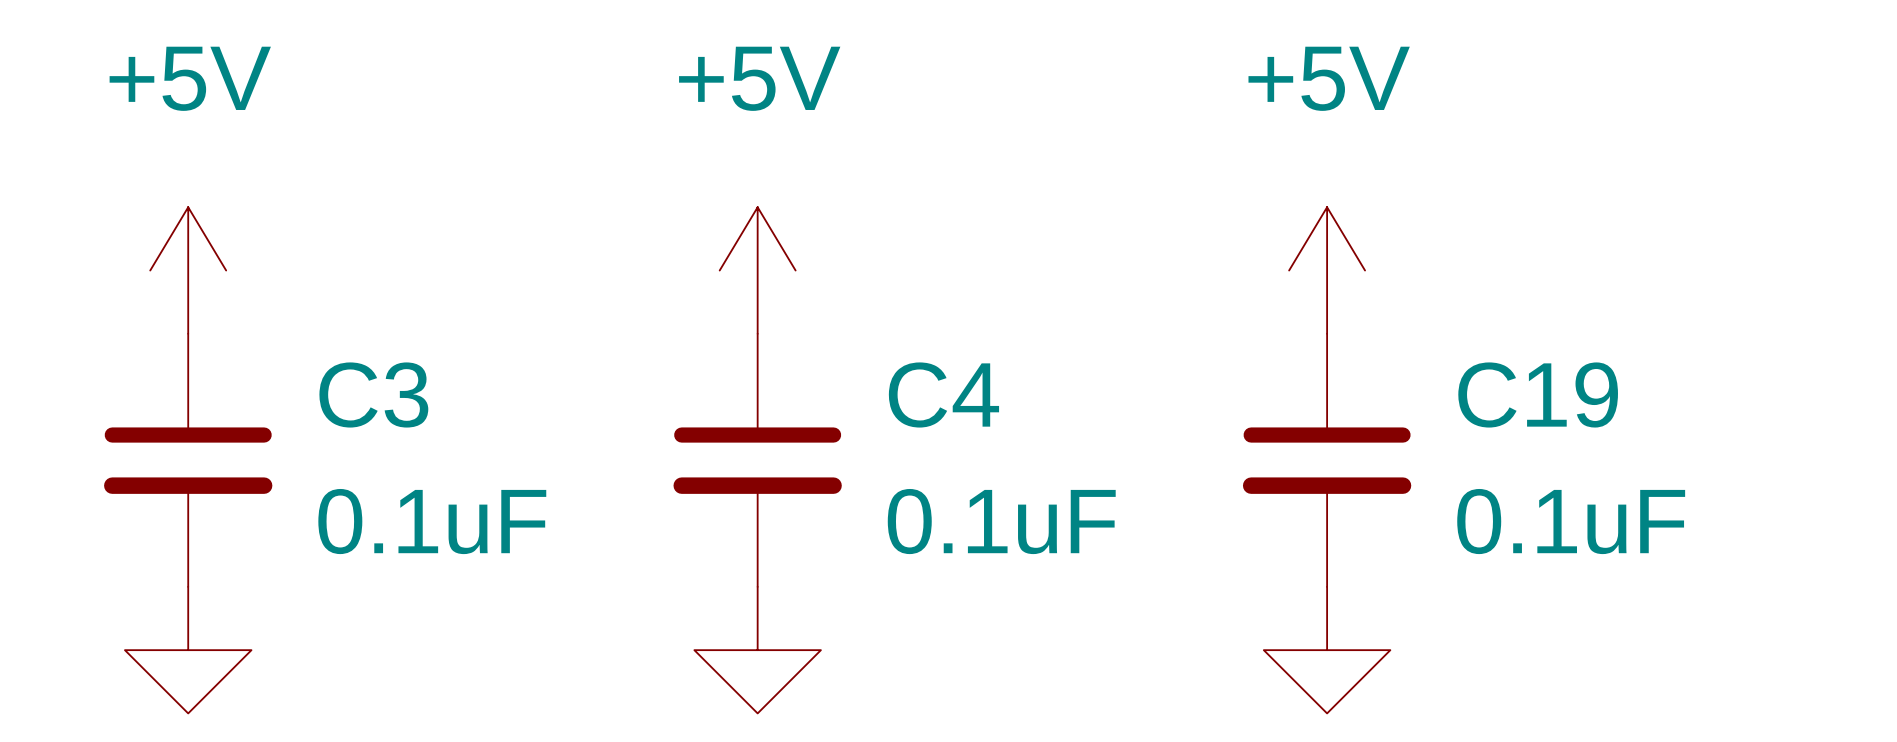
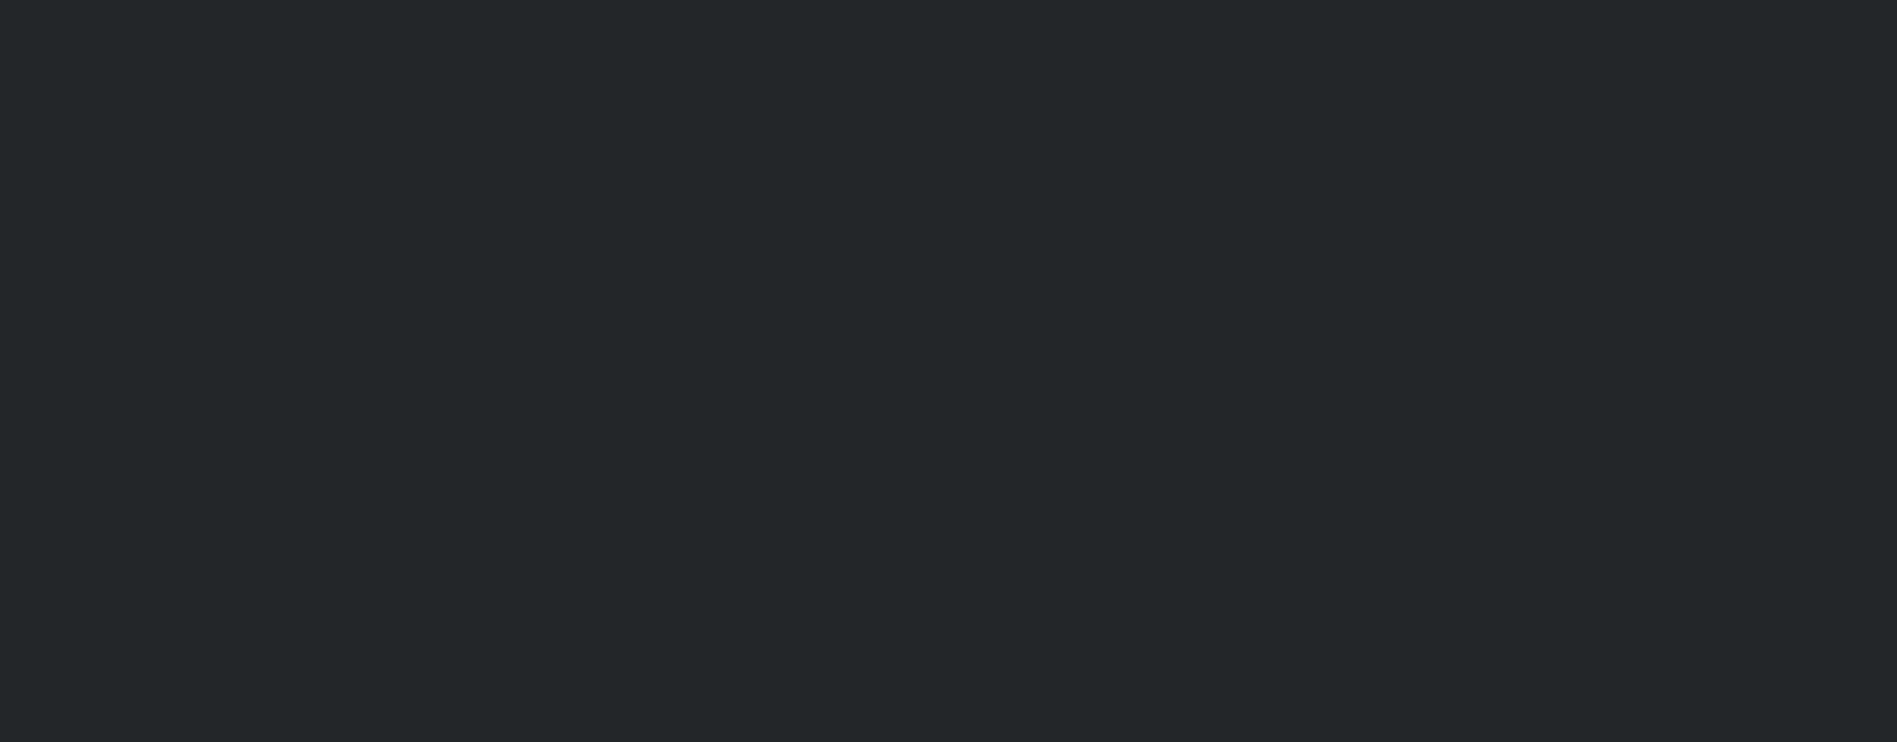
power symbol: +5V (188, 270) -> none
power symbol: +5V (757, 270) -> none
power symbol: +5V (1327, 270) -> none
C3: 0.1uF (188, 460) -> none
C4: 0.1uF (757, 460) -> none
C19: 0.1uF (1327, 460) -> none
power symbol: (188, 650) -> none
power symbol: (757, 650) -> none
power symbol: (1327, 650) -> none

